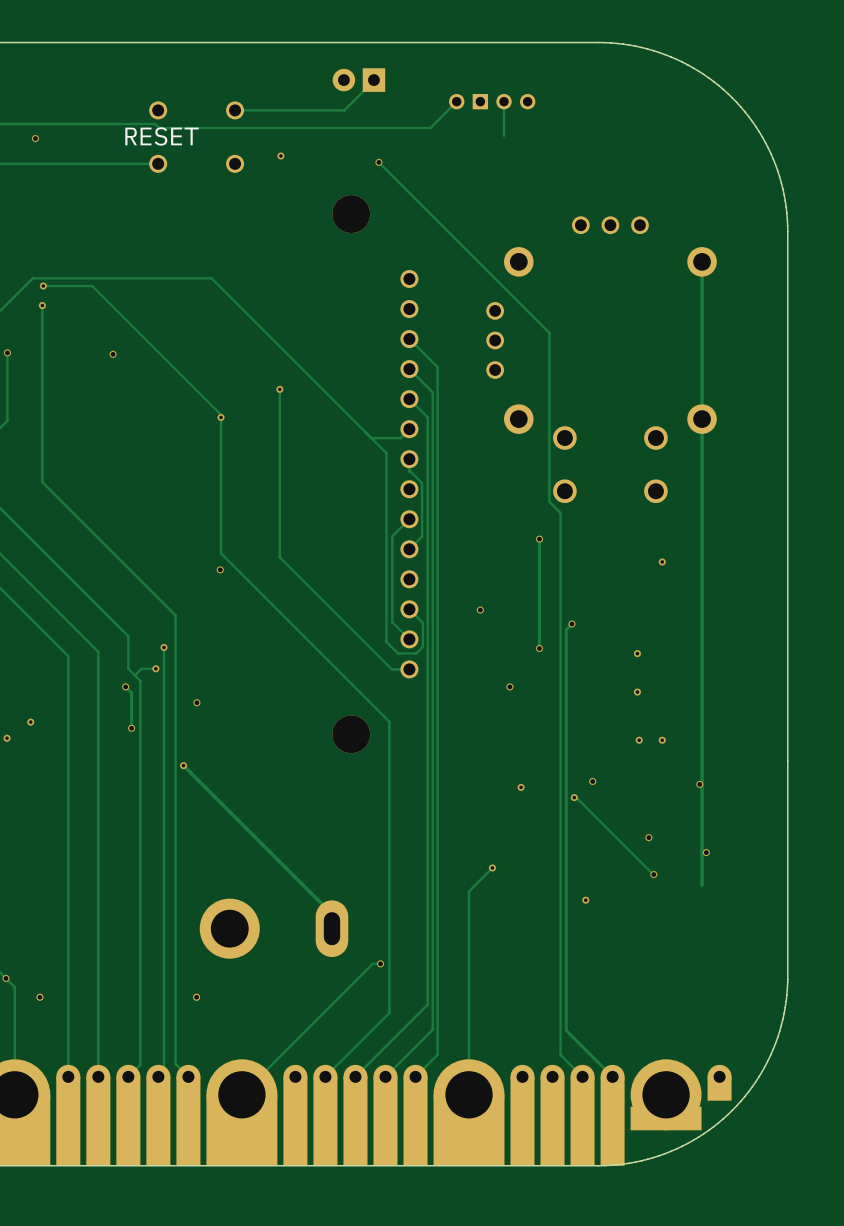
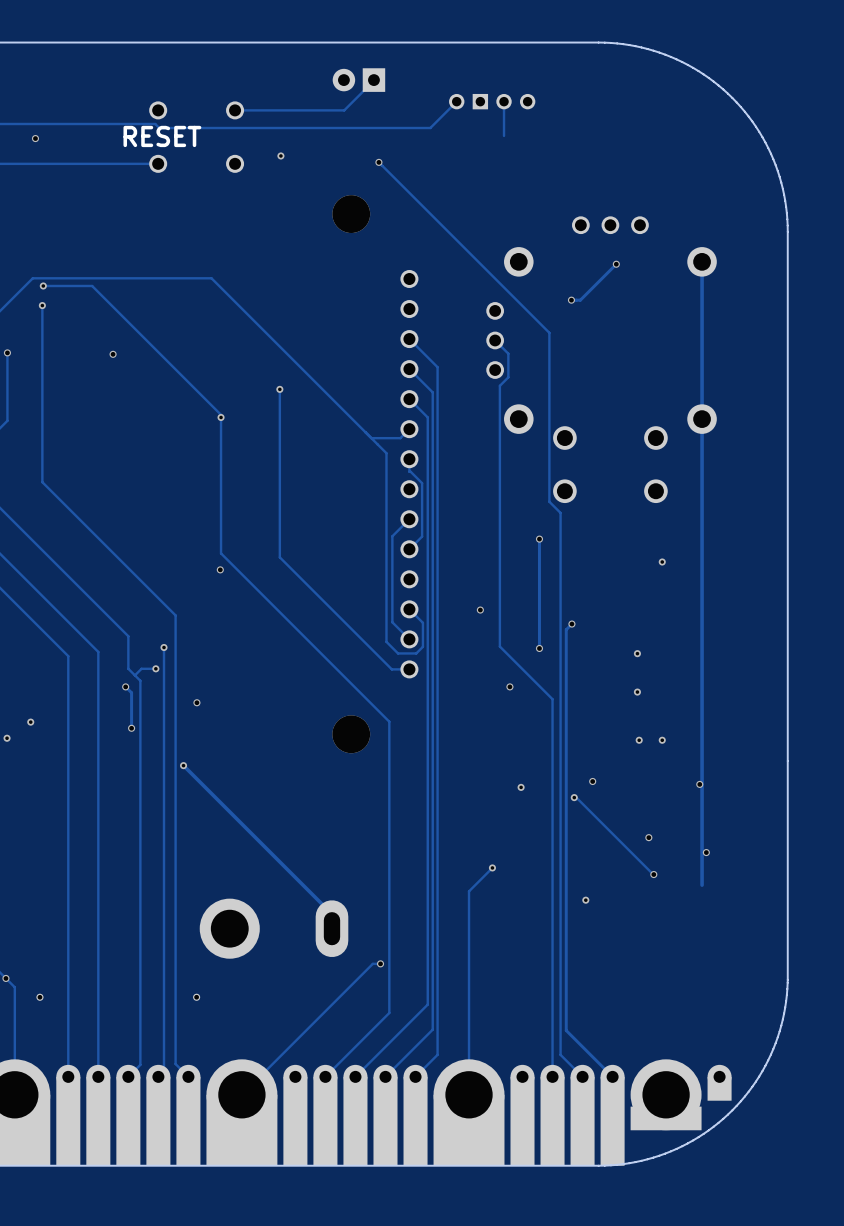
track: none -> (616, 264) (580, 300) (571, 300)
via: none -> (616, 264)
via: none -> (571, 300)
track: none -> (495, 340) (508, 353) (508, 377) (499, 385) (499, 646) (552, 699) (552, 1121)

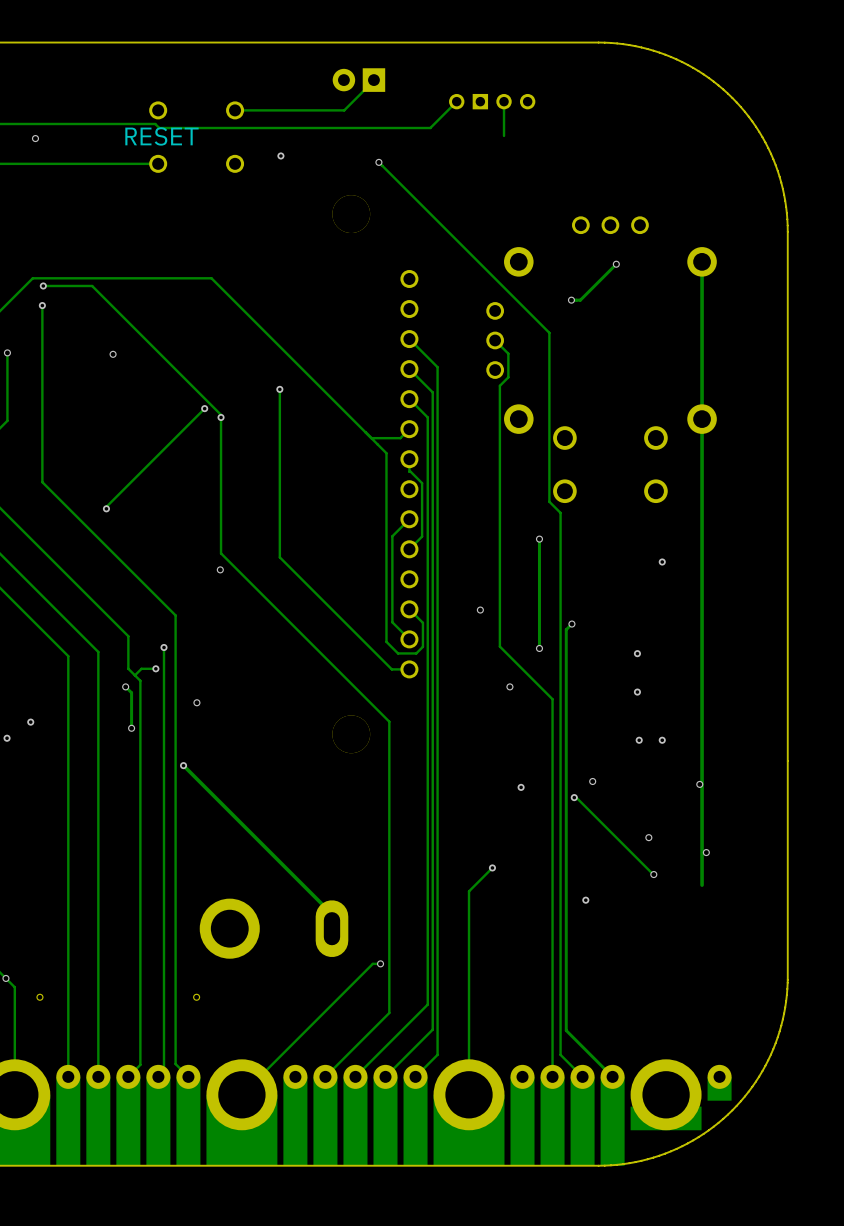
track: none -> (204, 408) (106, 508)
via: none -> (204, 408)
via: none -> (106, 508)

